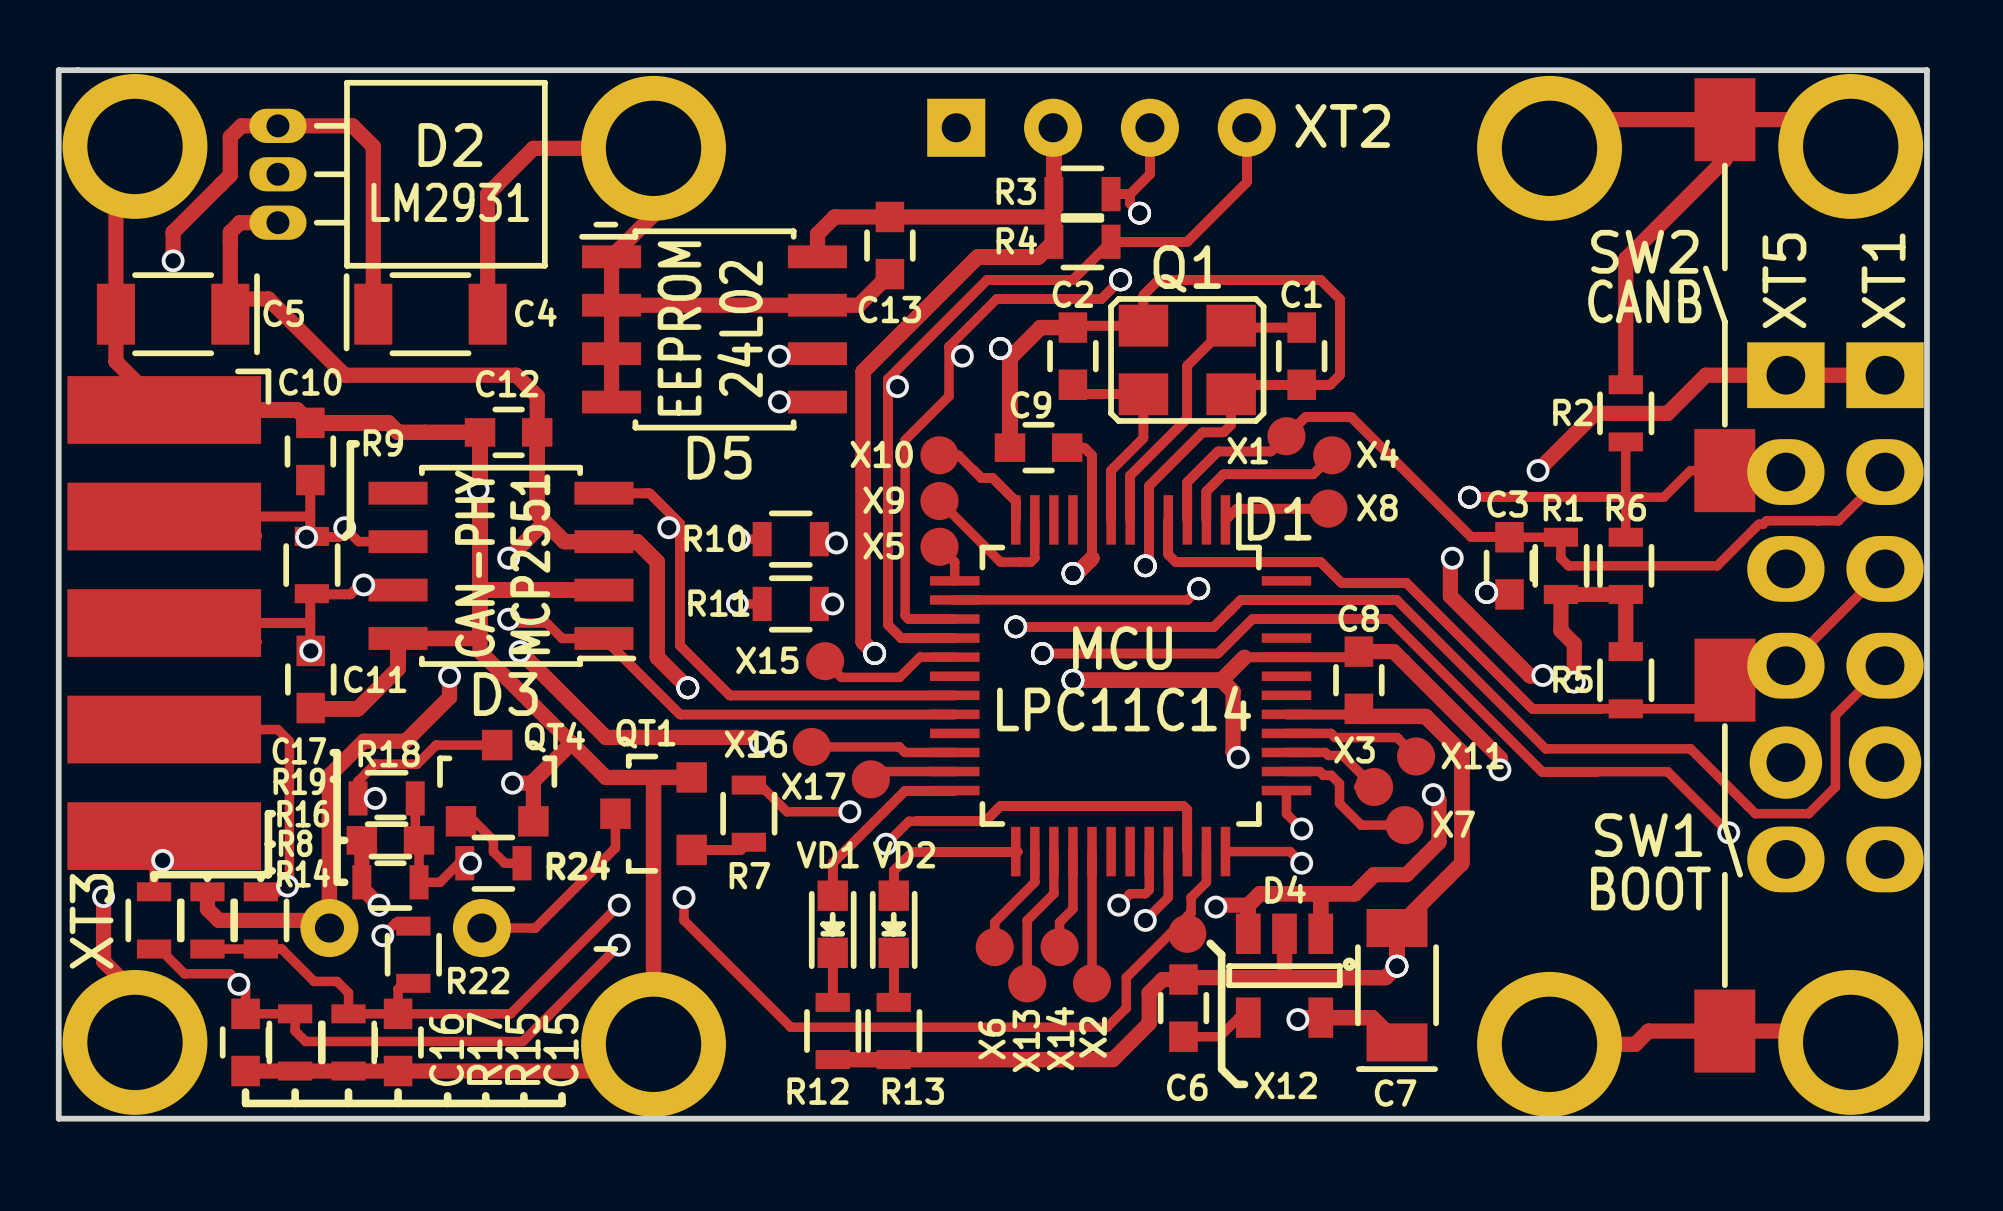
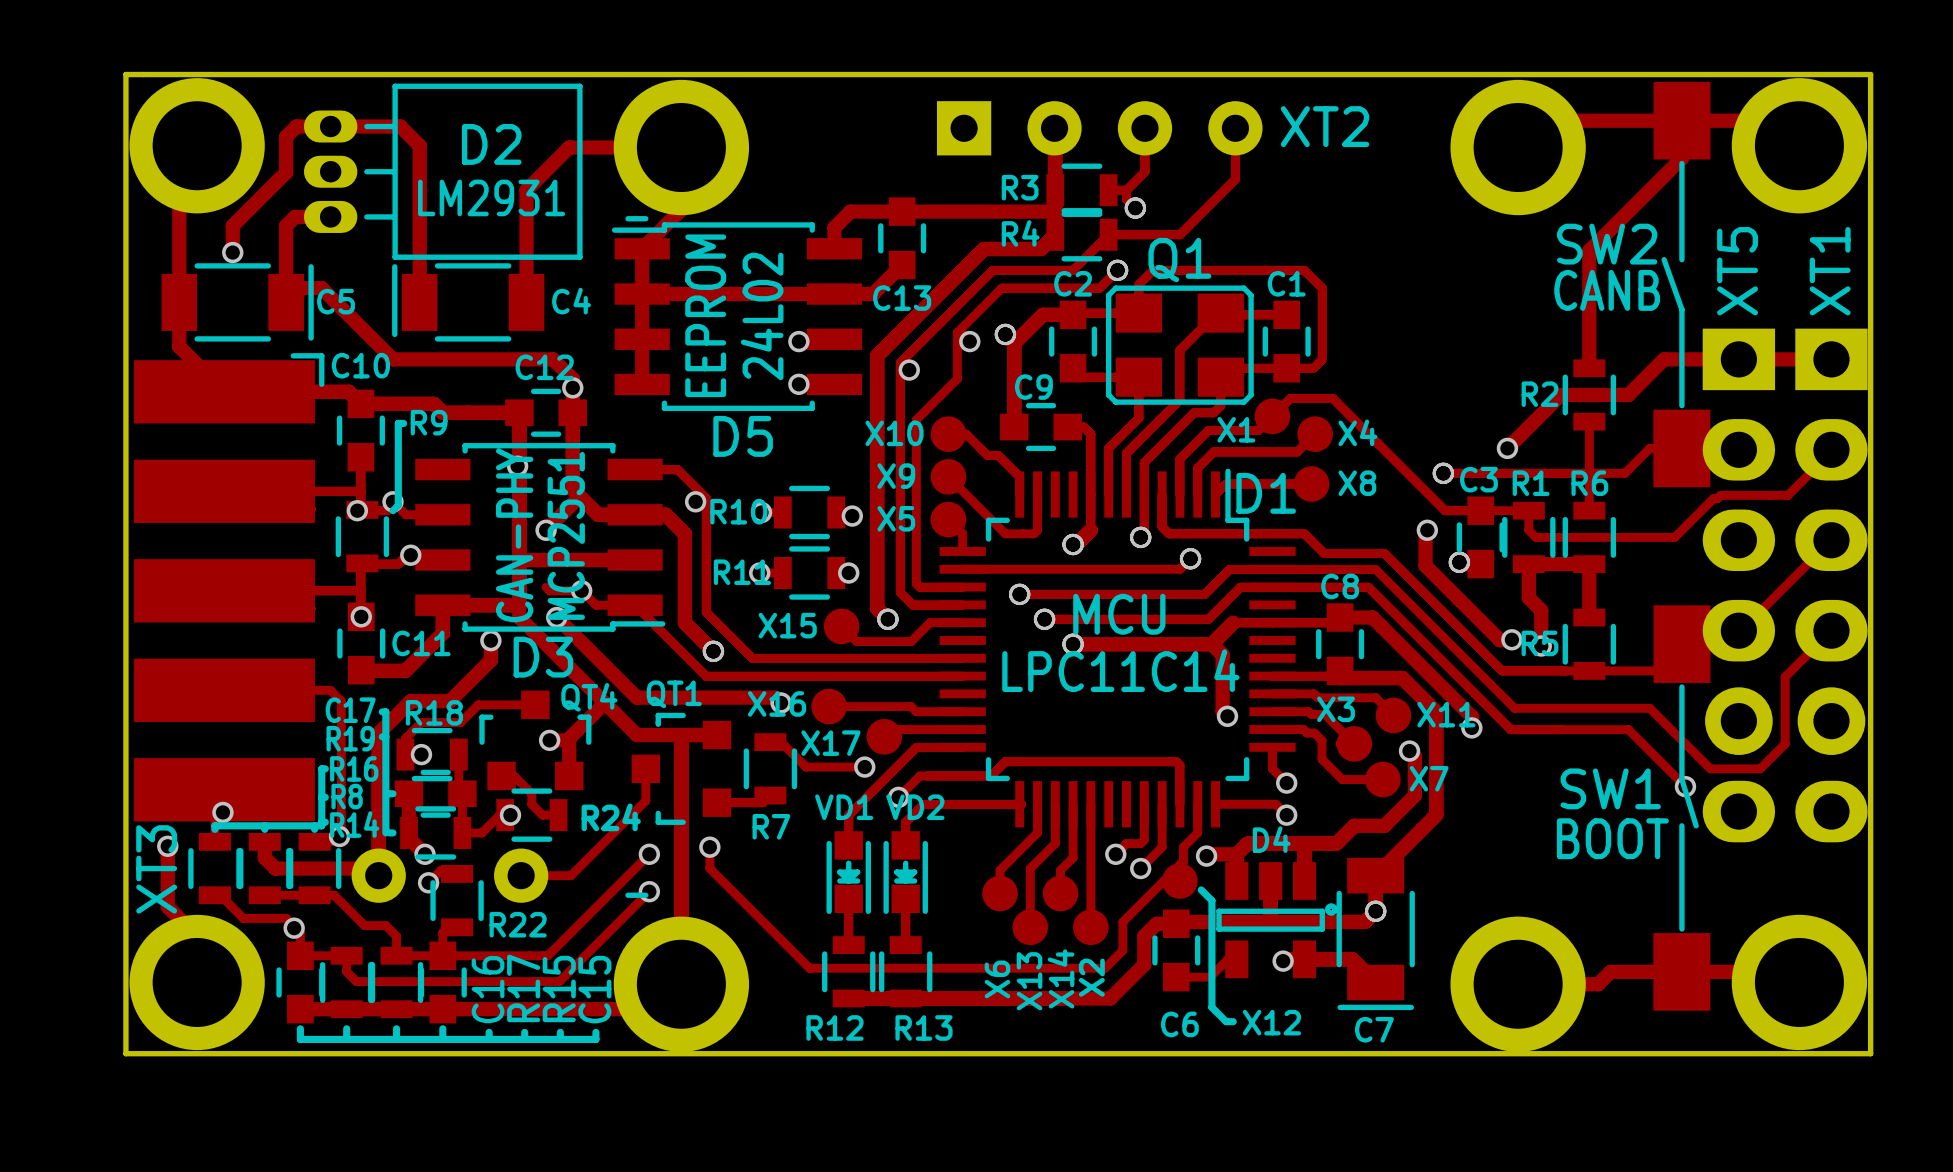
via: none -> (572, 387)
via position: (508, 619) -> (581, 590)

